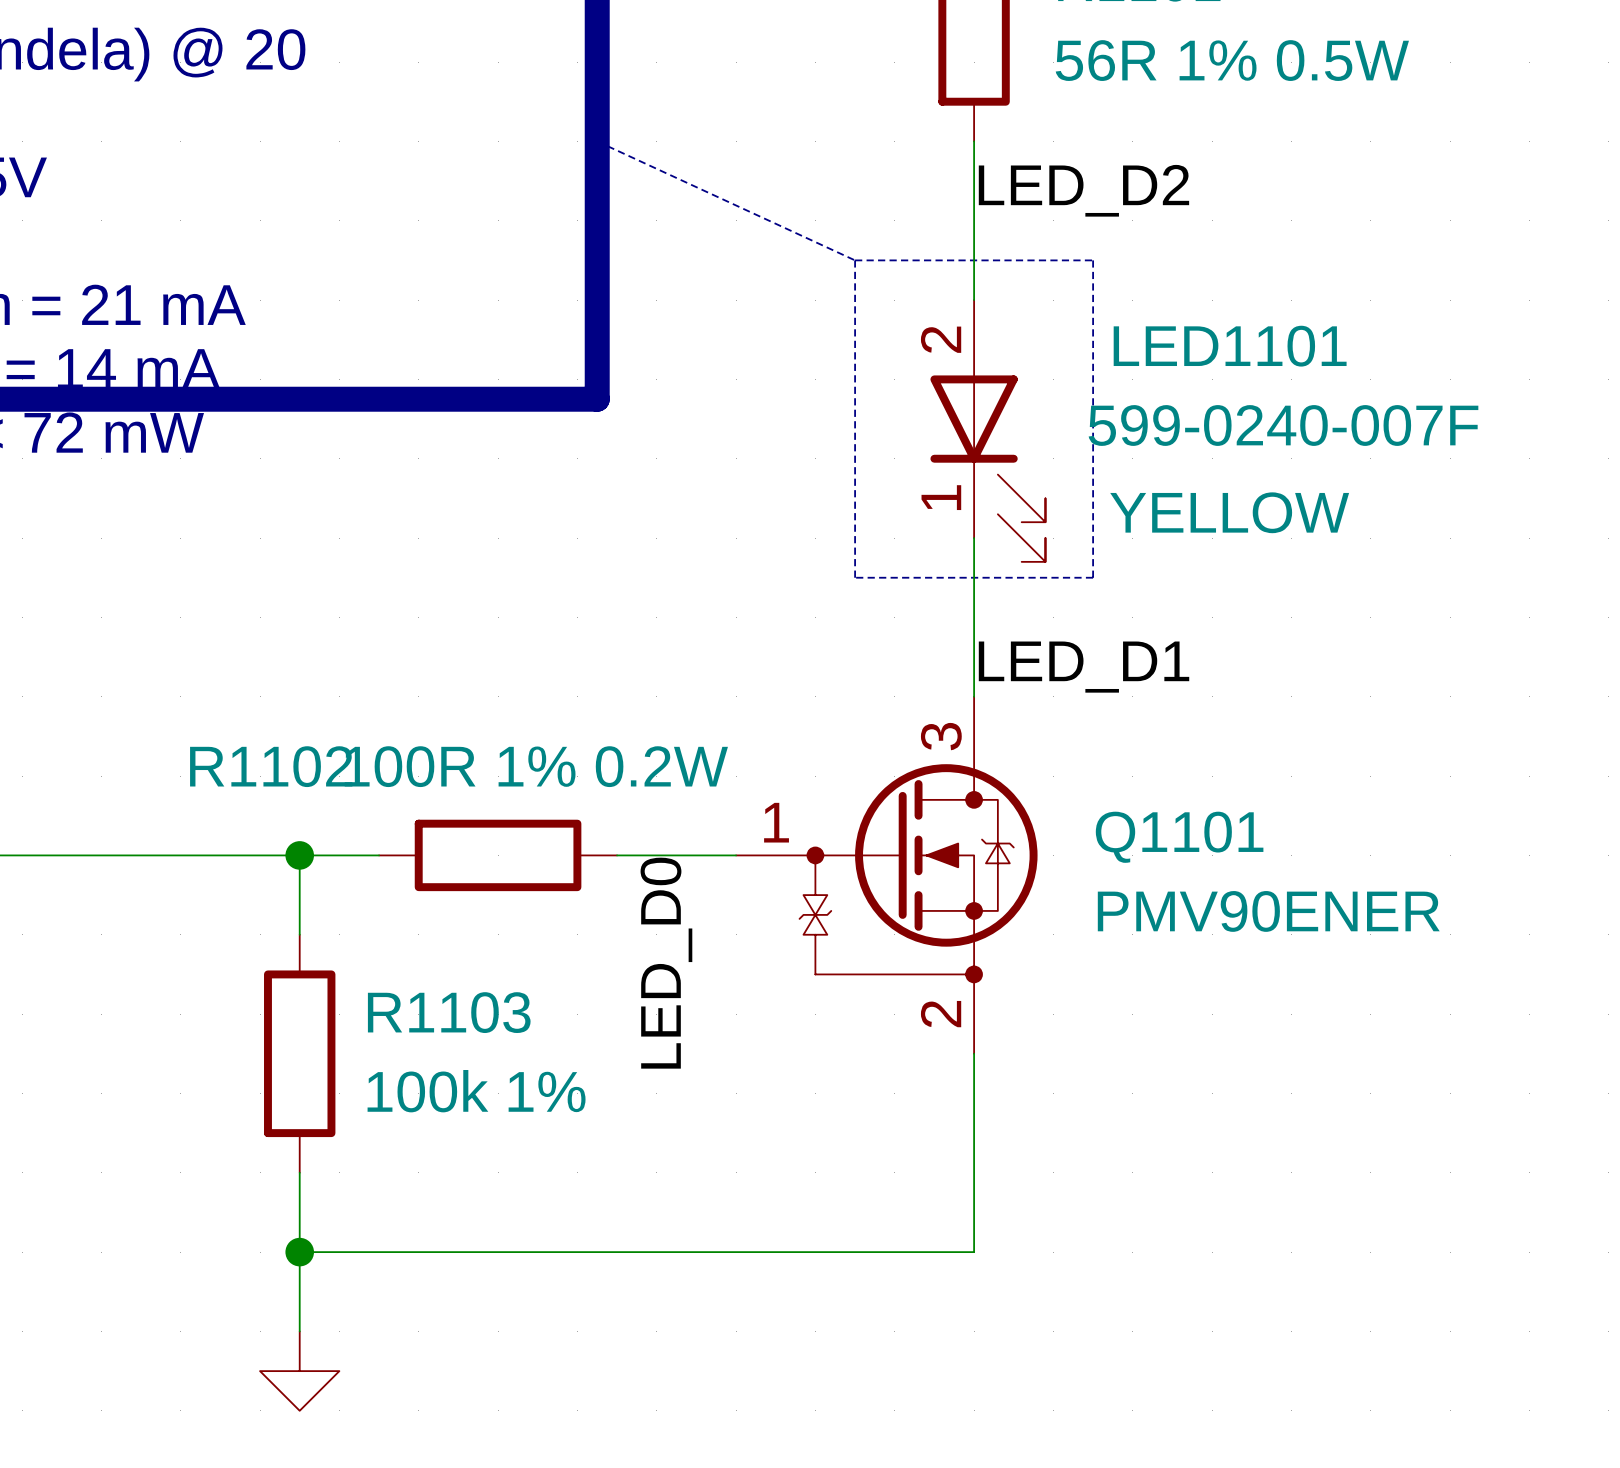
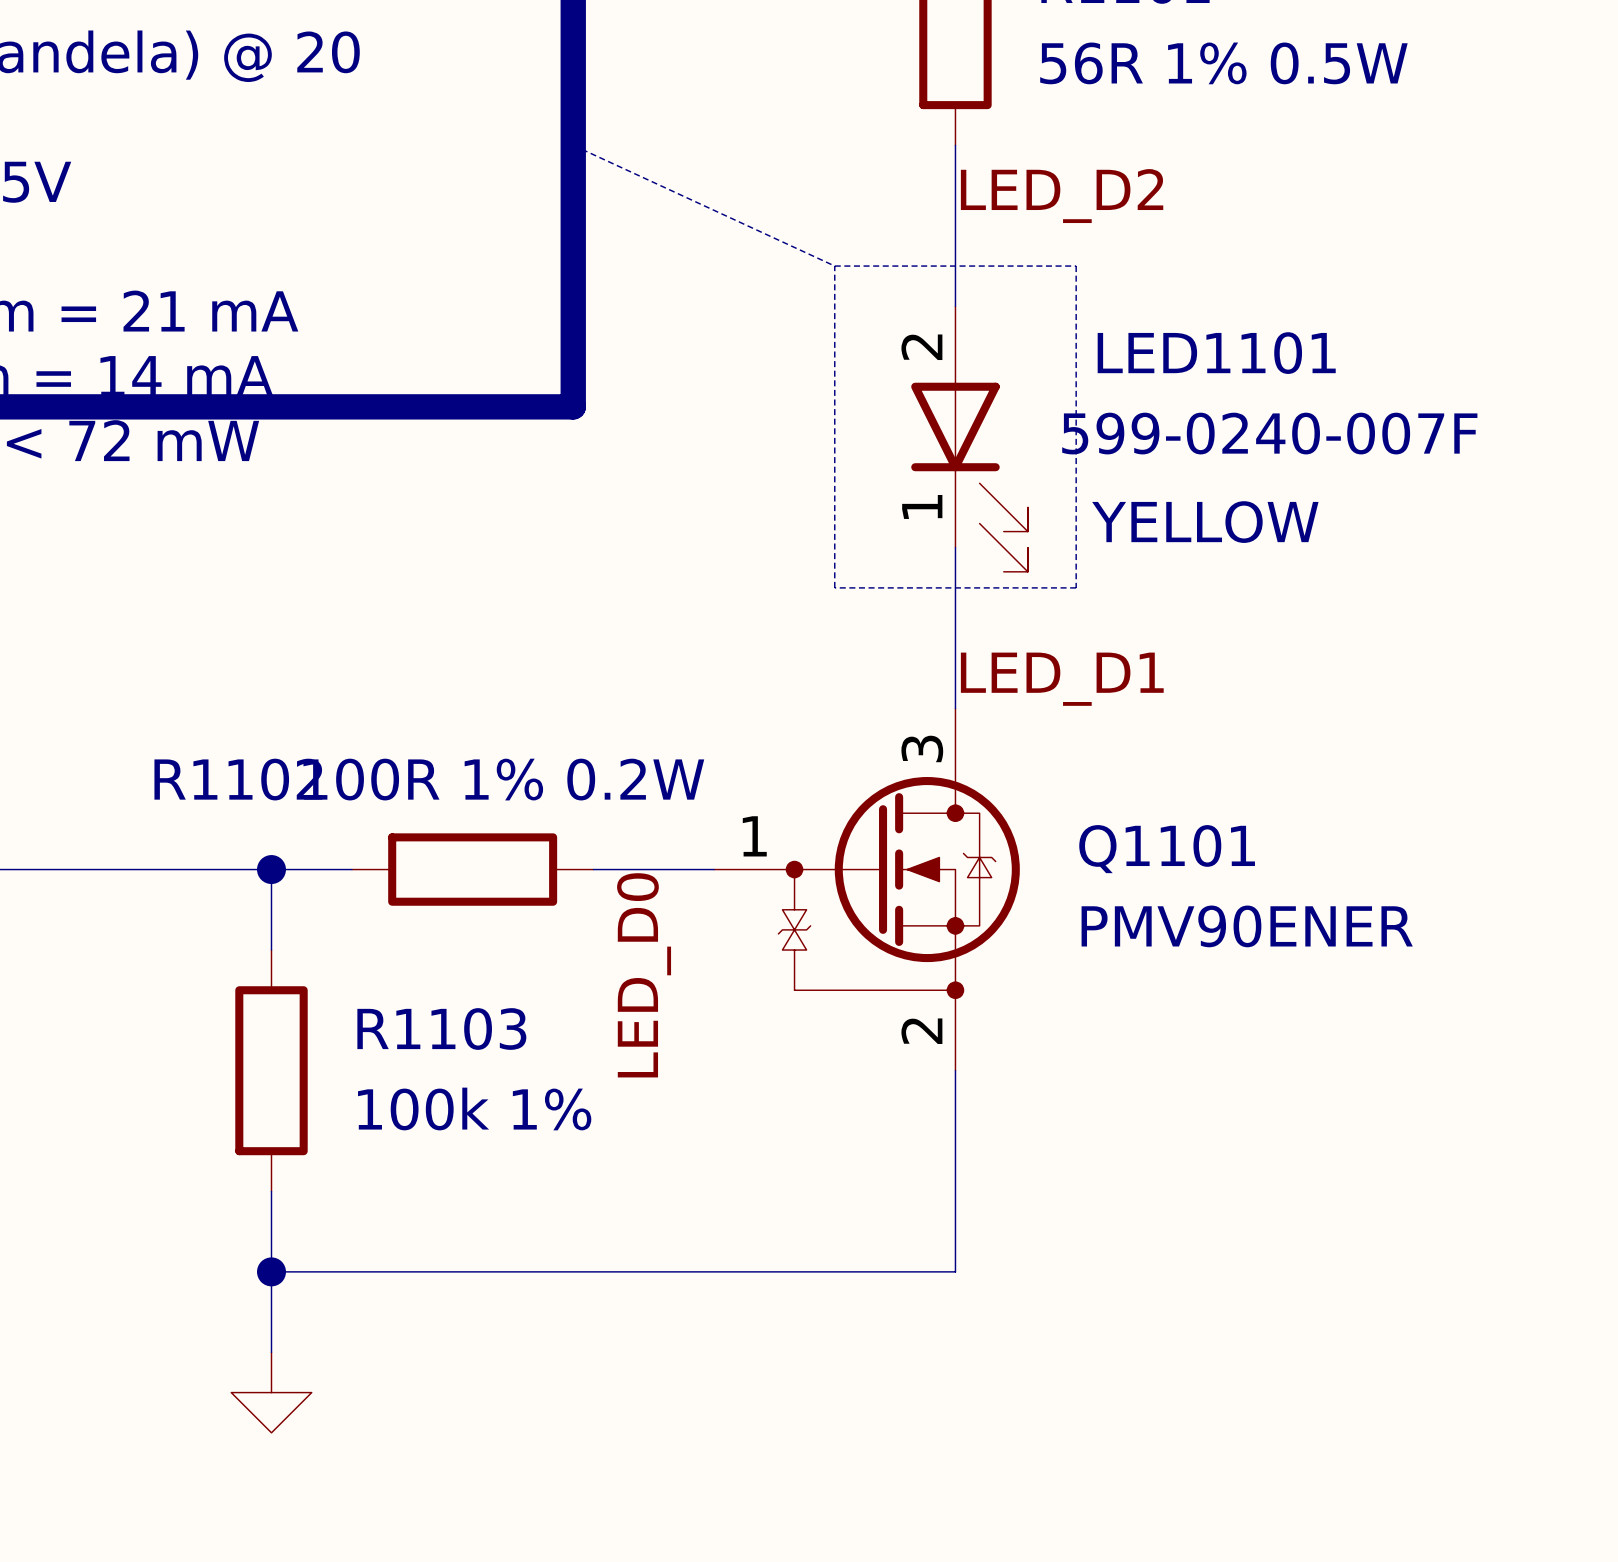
R1103 name position: R1103 (449, 1012) -> R1103 (441, 1029)
R1103 value position: 100k 1% (476, 1091) -> 100k 1% (474, 1108)

